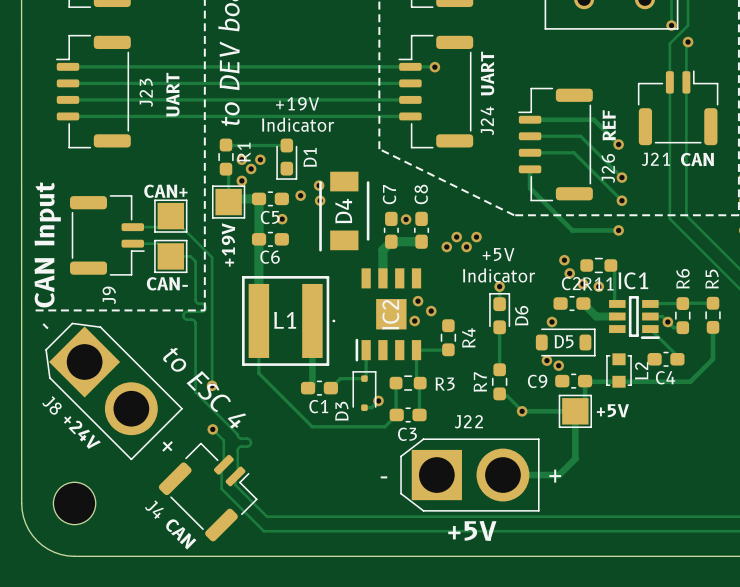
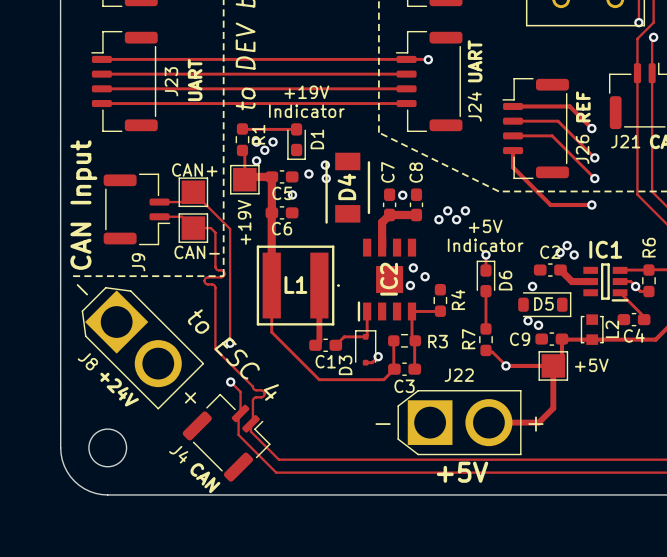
via: (564, 260) -> none
R11: (598, 265) -> none
track: (610, 265) (614, 269) (614, 301) (617, 303) -> none
via: (569, 273) -> none
via: none -> (567, 245)

